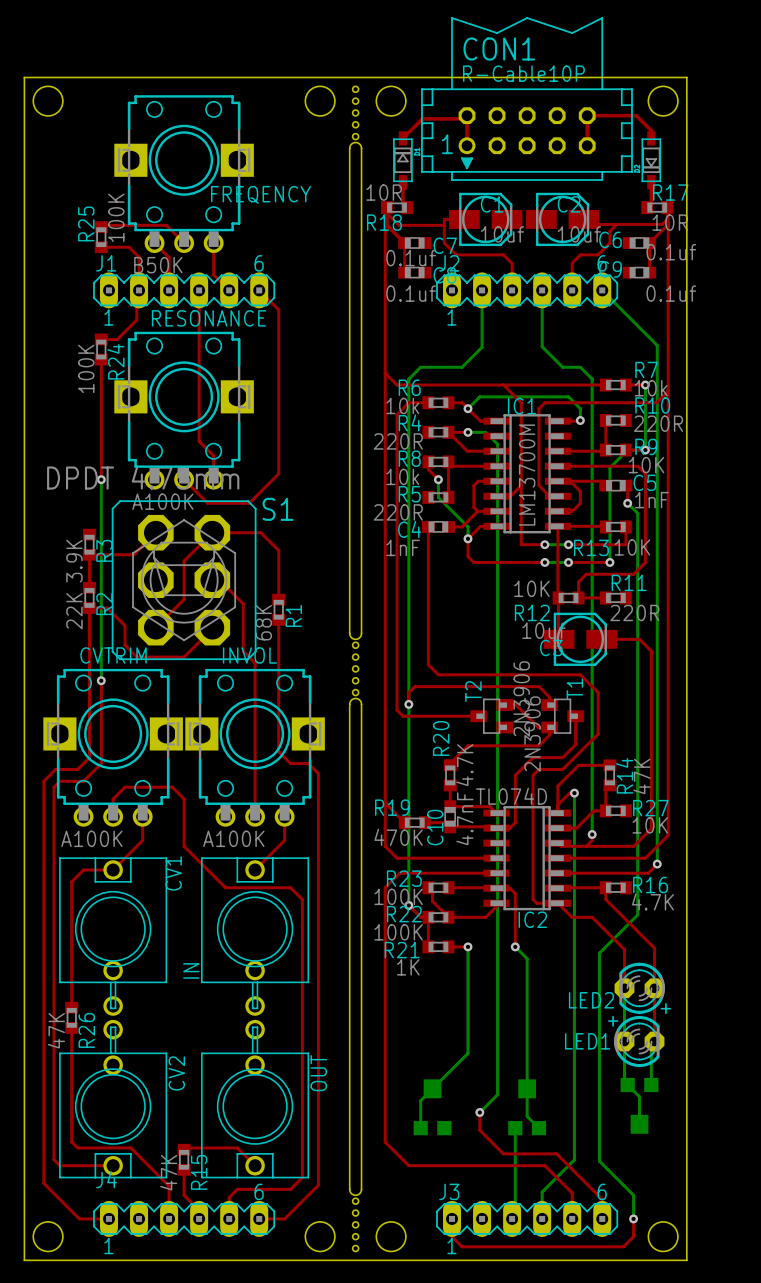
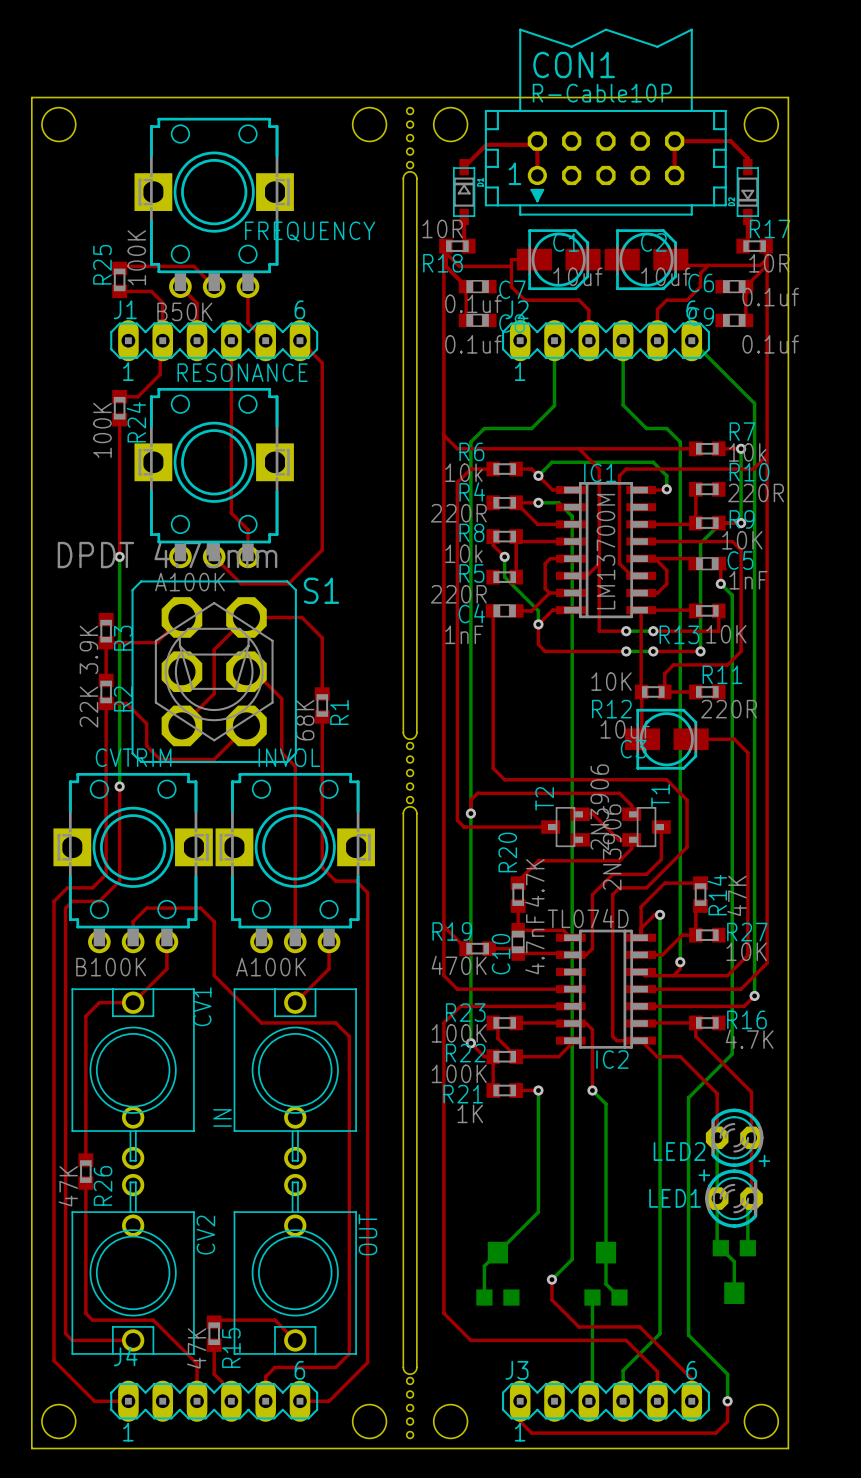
FREQENCY name: FREQENCY (261, 194) -> FREQUENCY (310, 231)
CVTRIM value: A100K (91, 838) -> B100K (111, 967)

